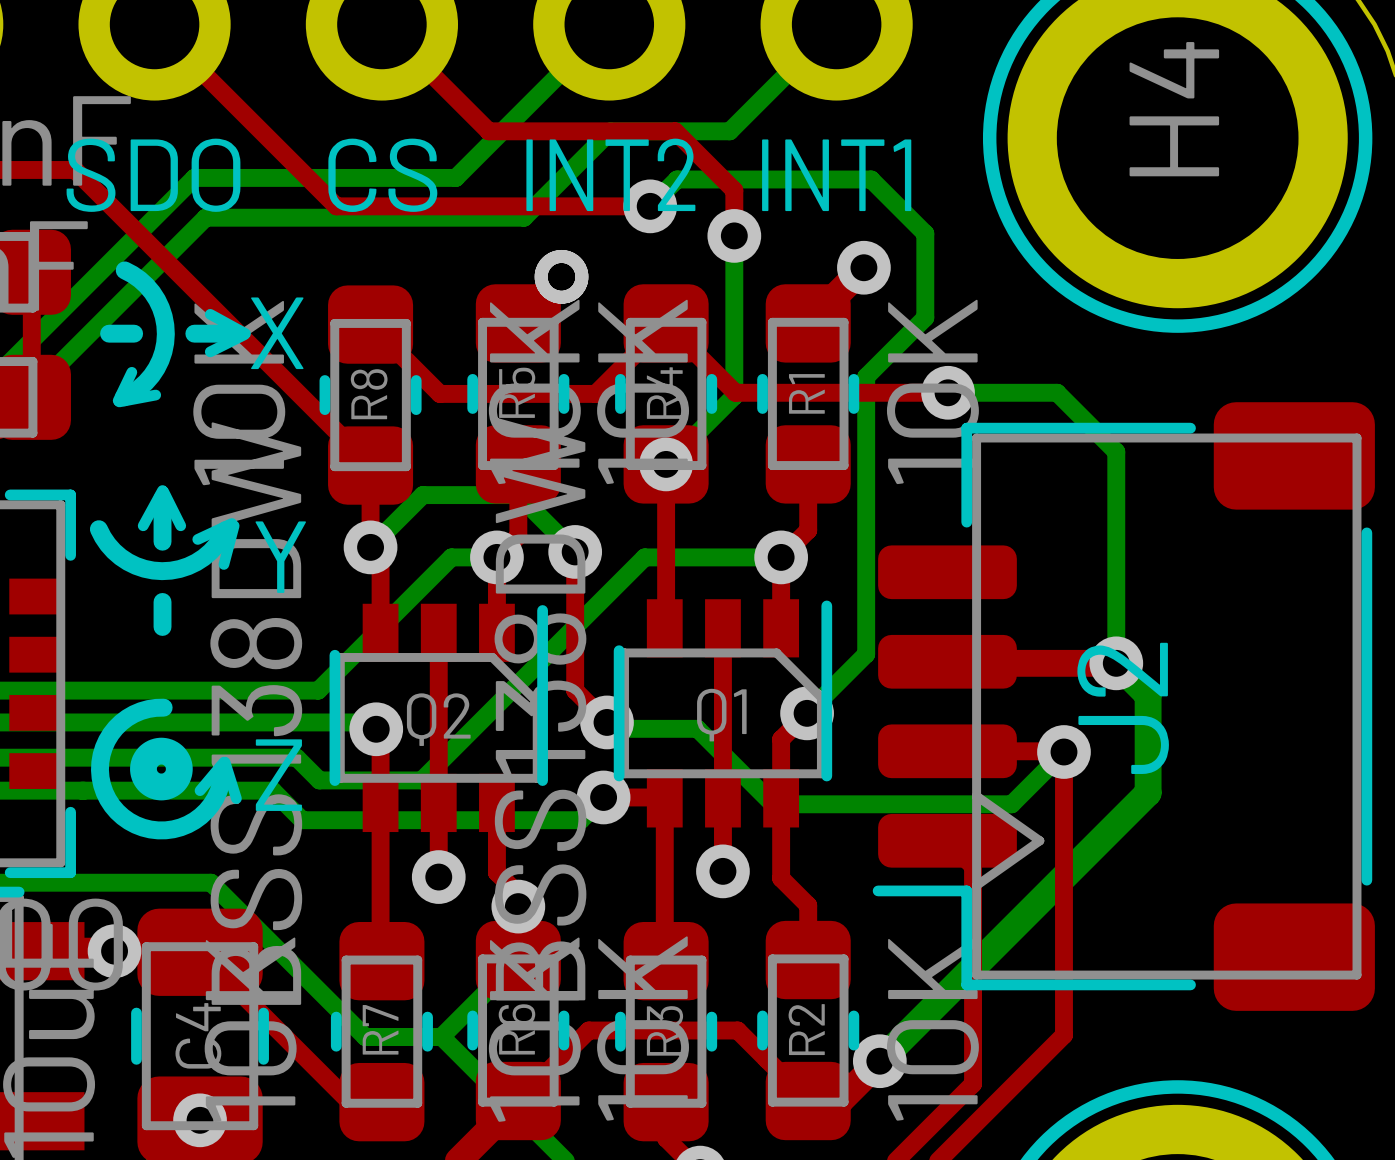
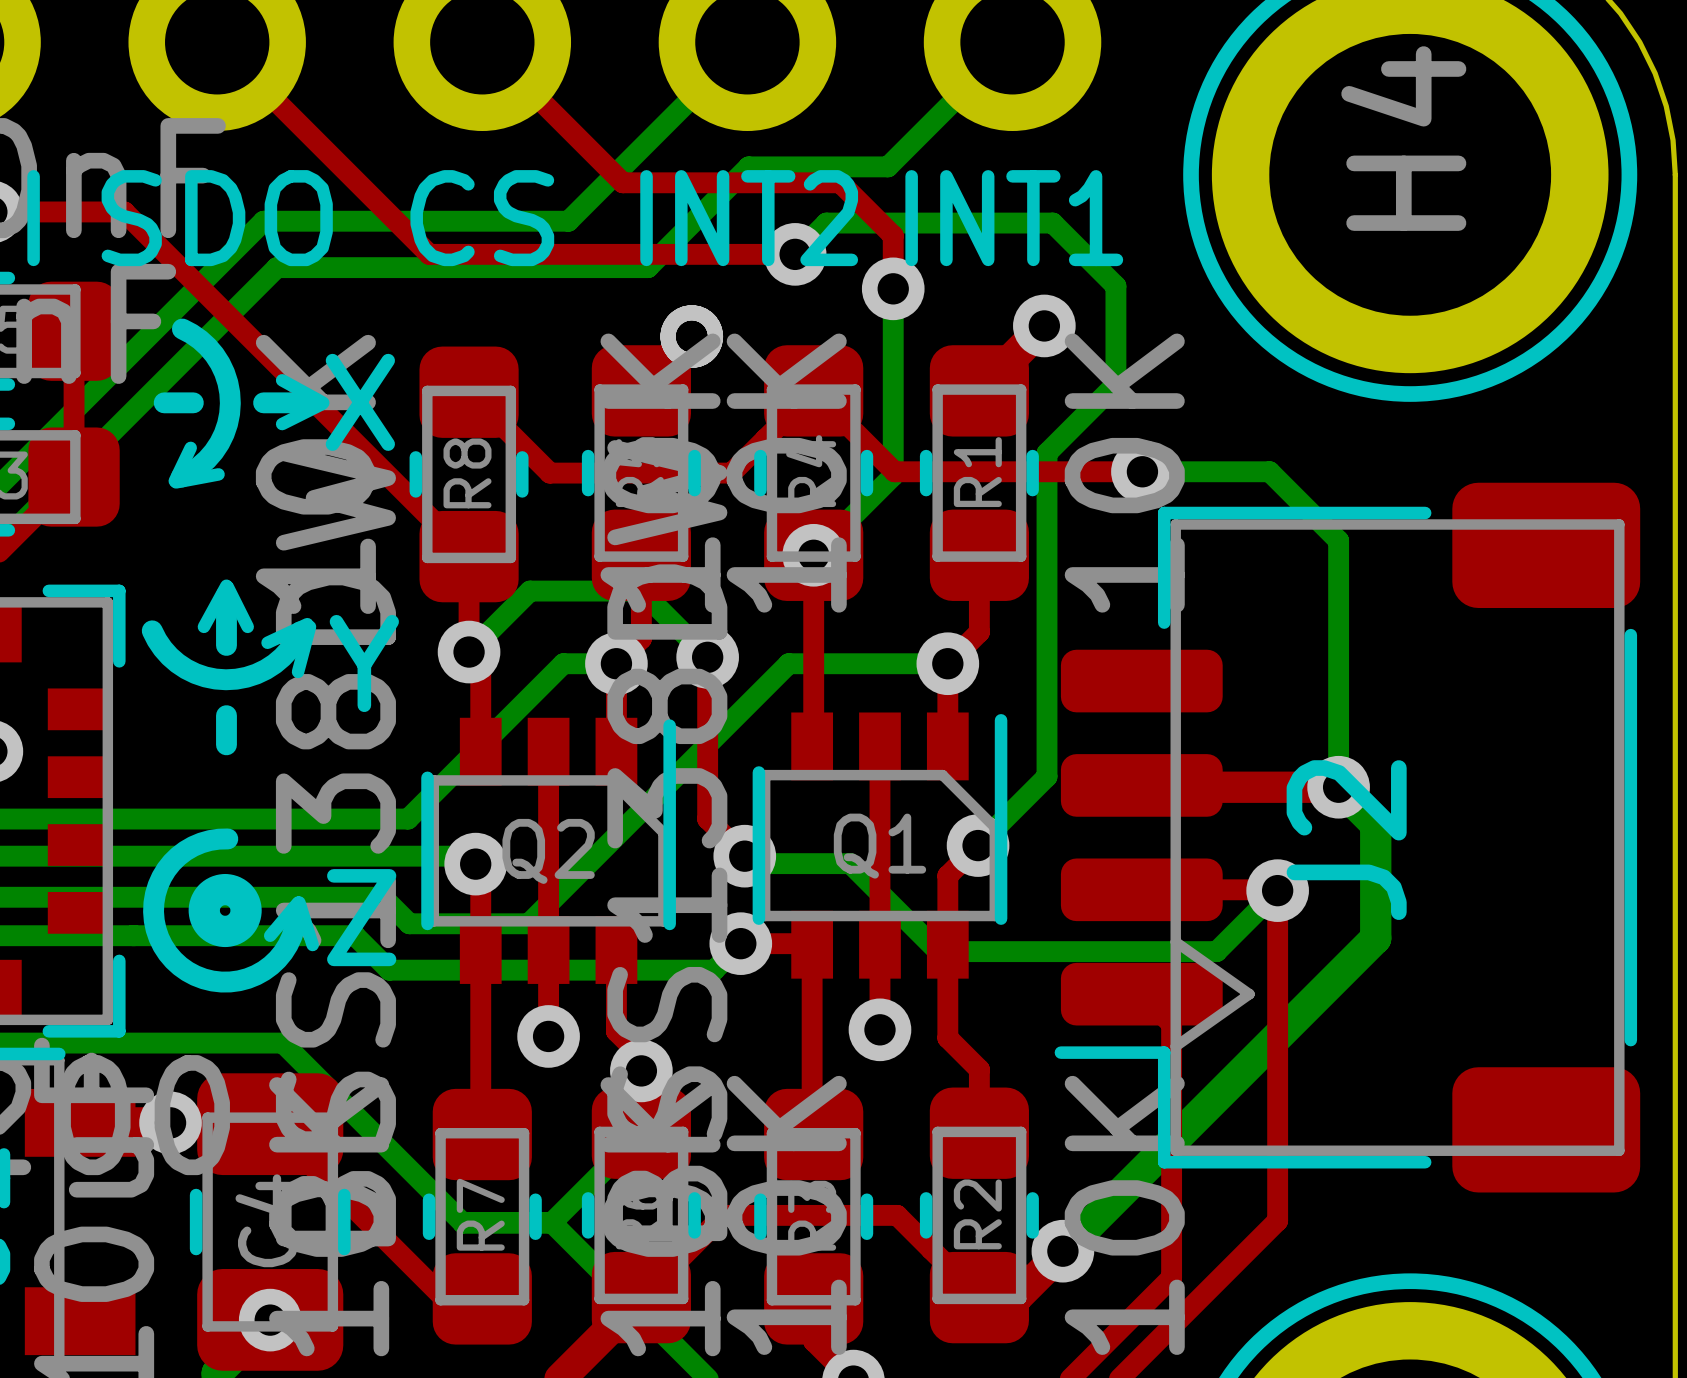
top track: (488, 131) (675, 131) (688, 144) -> (606, 166) (622, 182) (840, 182)

